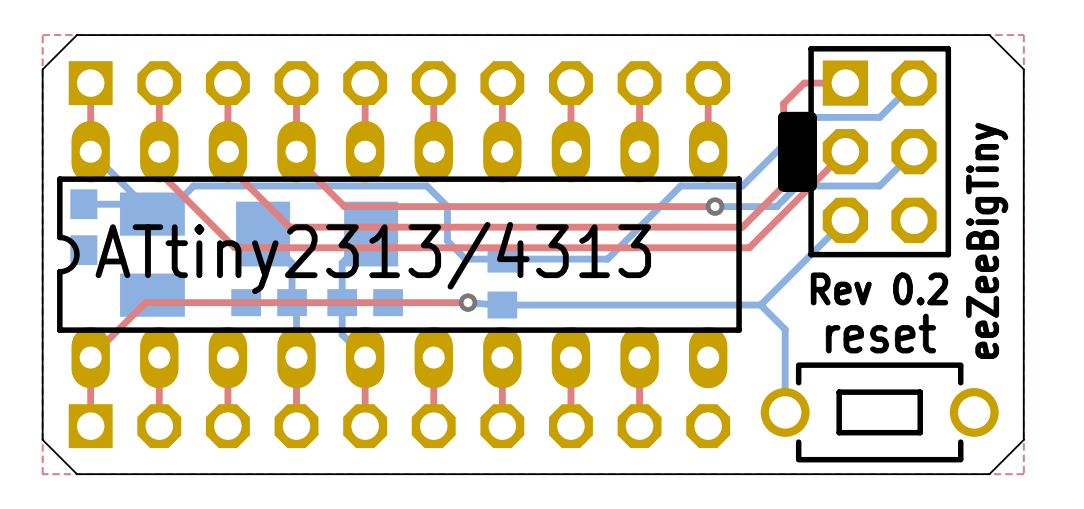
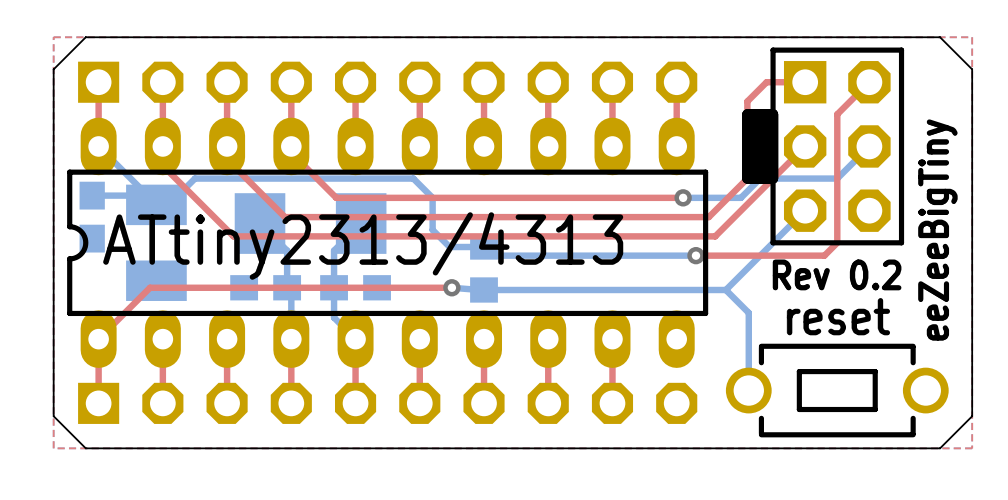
top track: none -> (869, 82) (837, 114) (837, 242) (824, 255) (695, 255)
bottom track: (914, 83) (879, 117) (811, 117) (742, 186) (680, 186) (607, 259) (502, 259) -> (695, 255) (490, 255) (484, 247)
via: none -> (695, 255)

